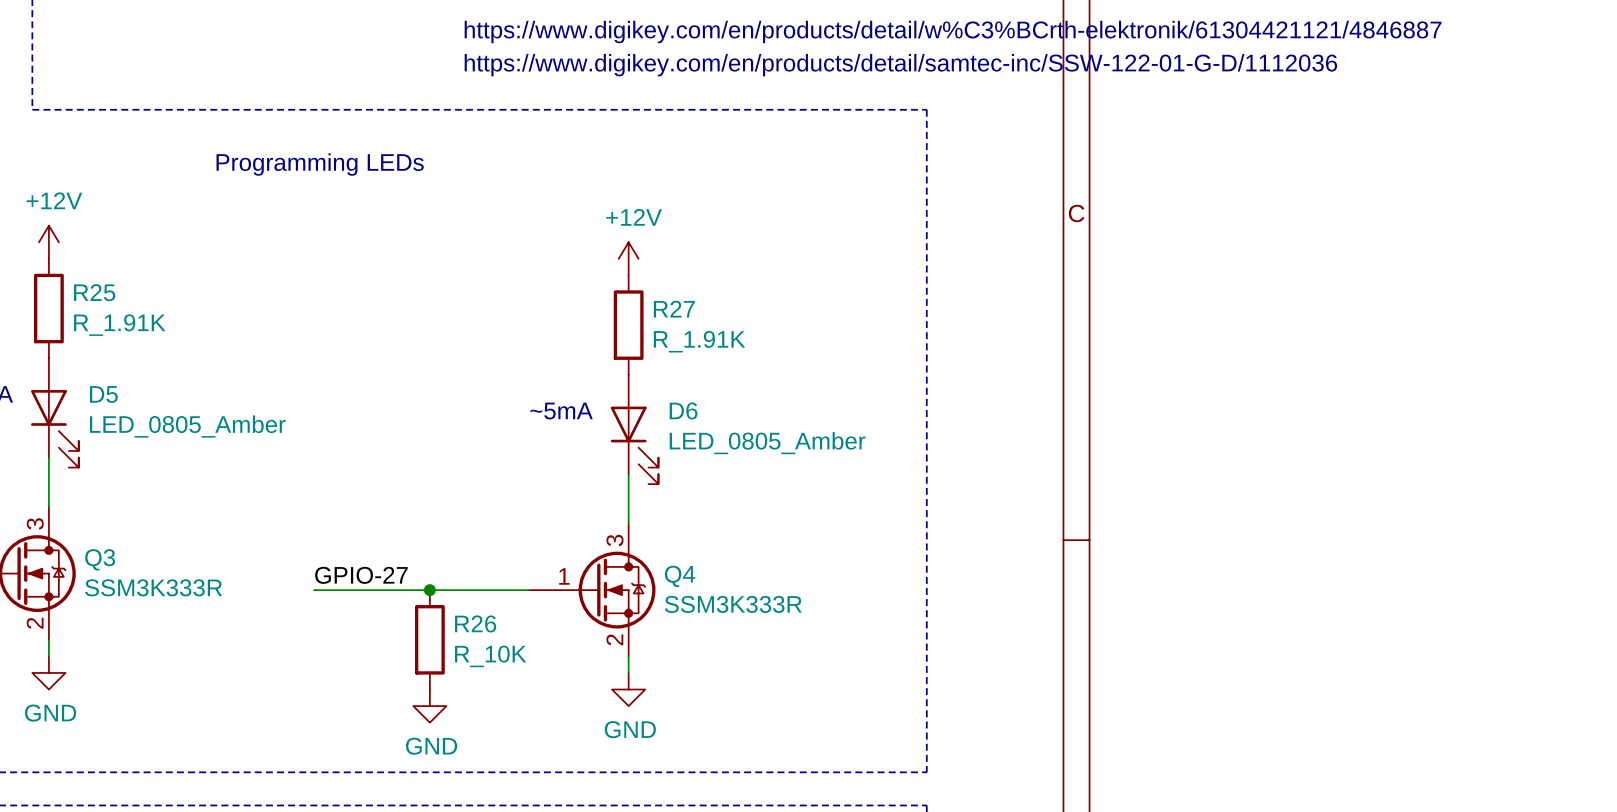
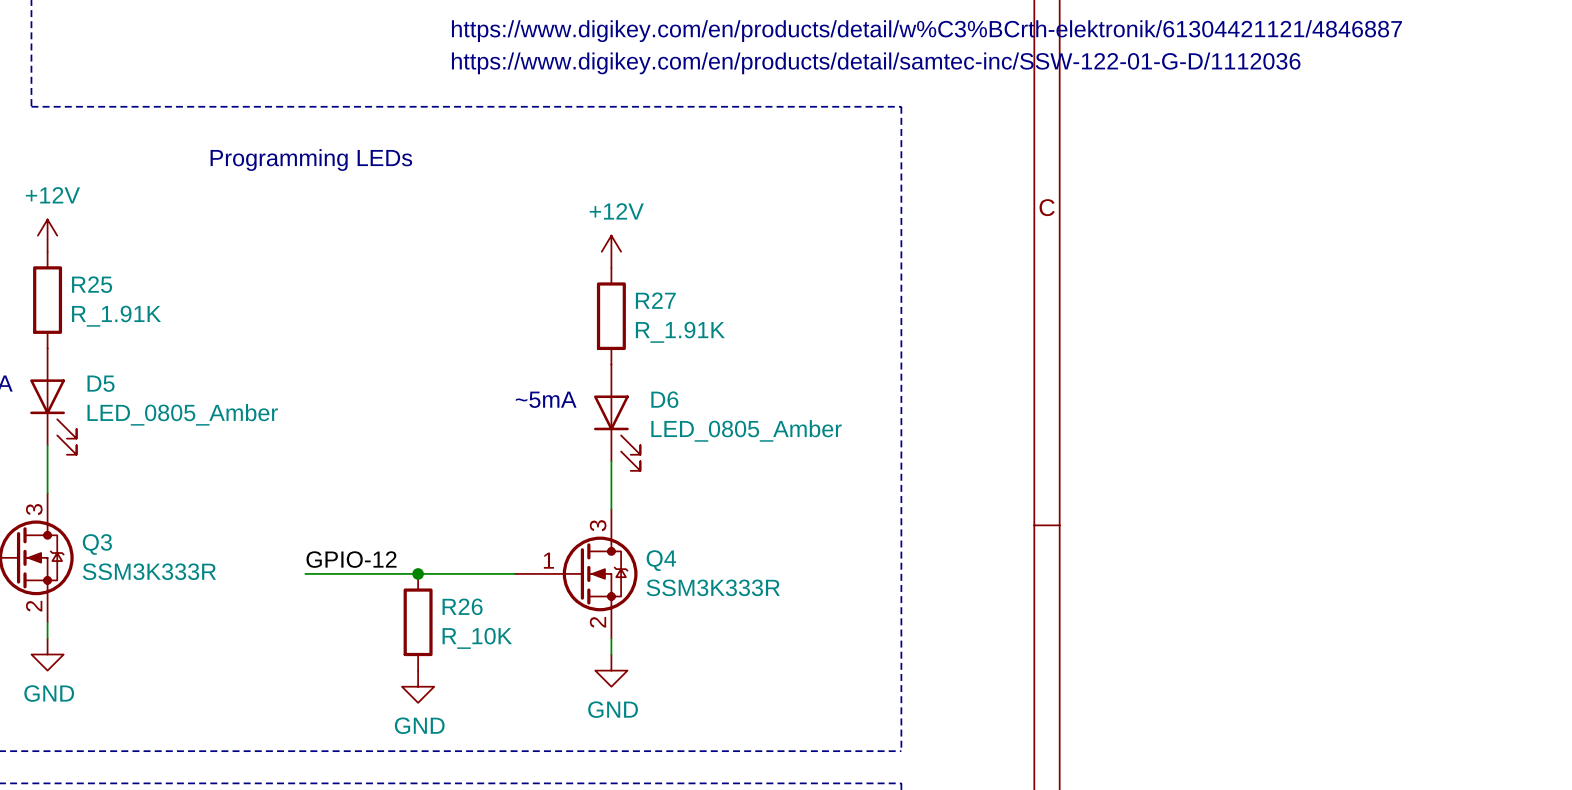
label: GPIO-27 (361, 575) -> GPIO-12 (351, 559)

